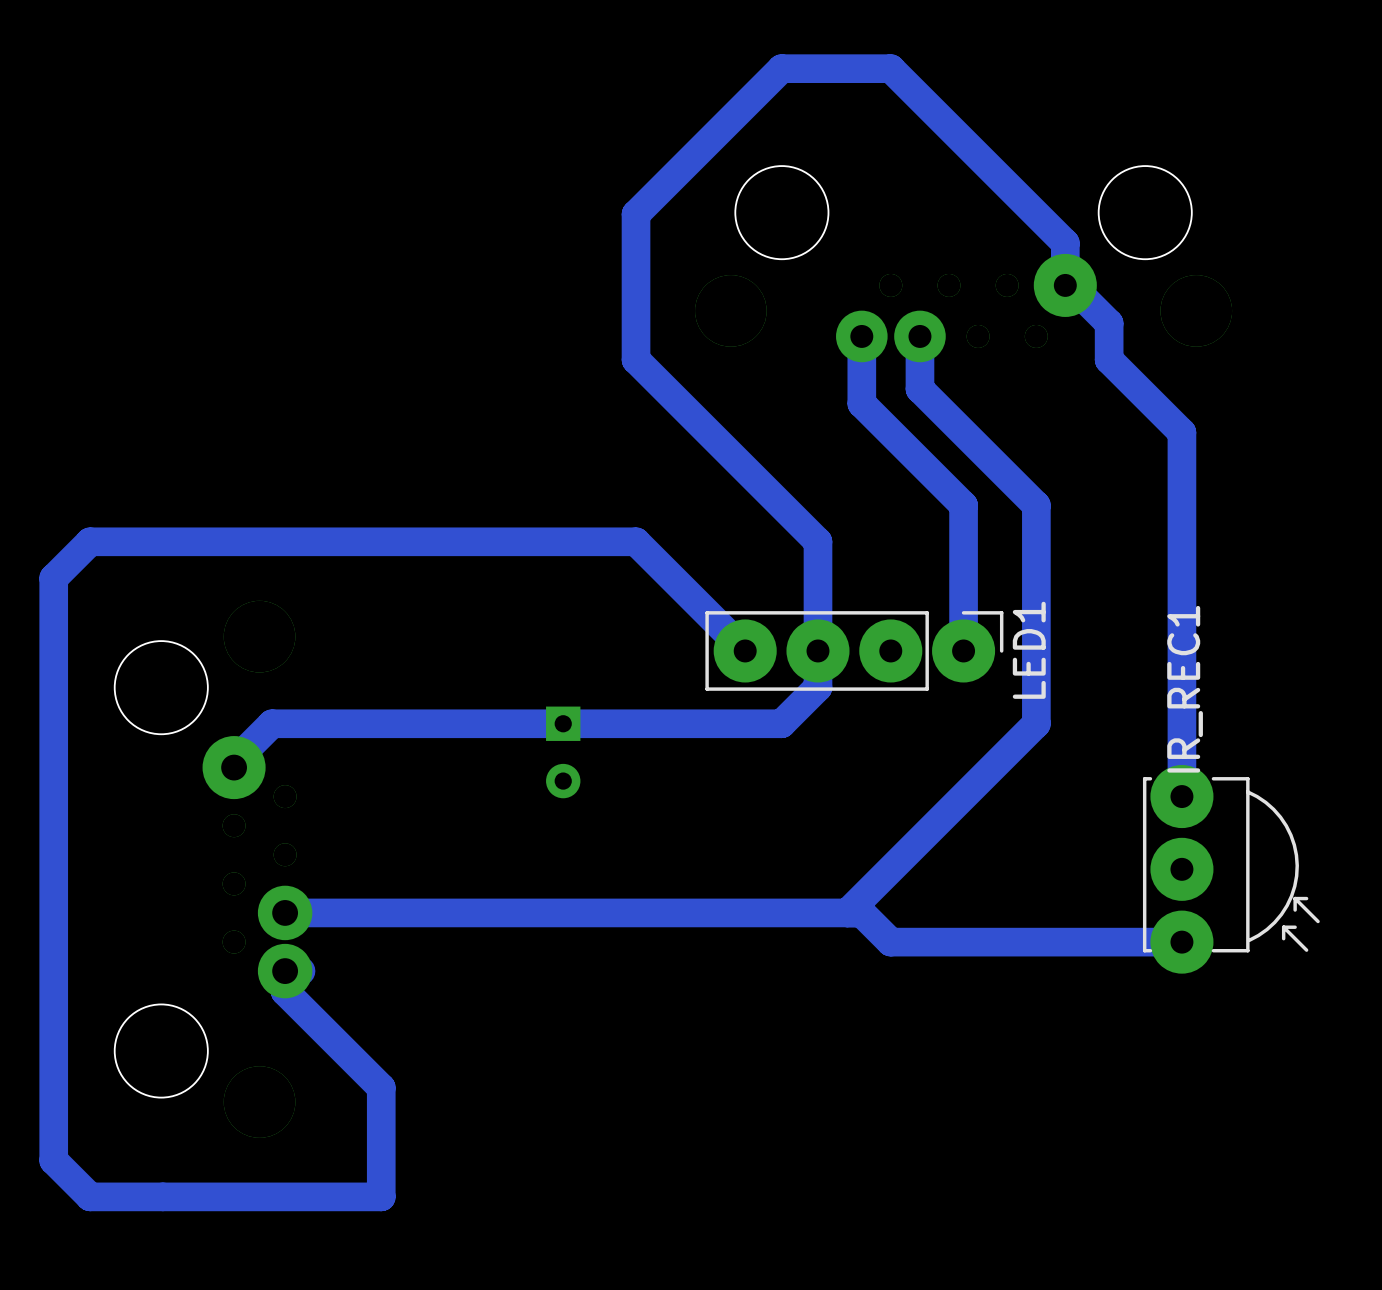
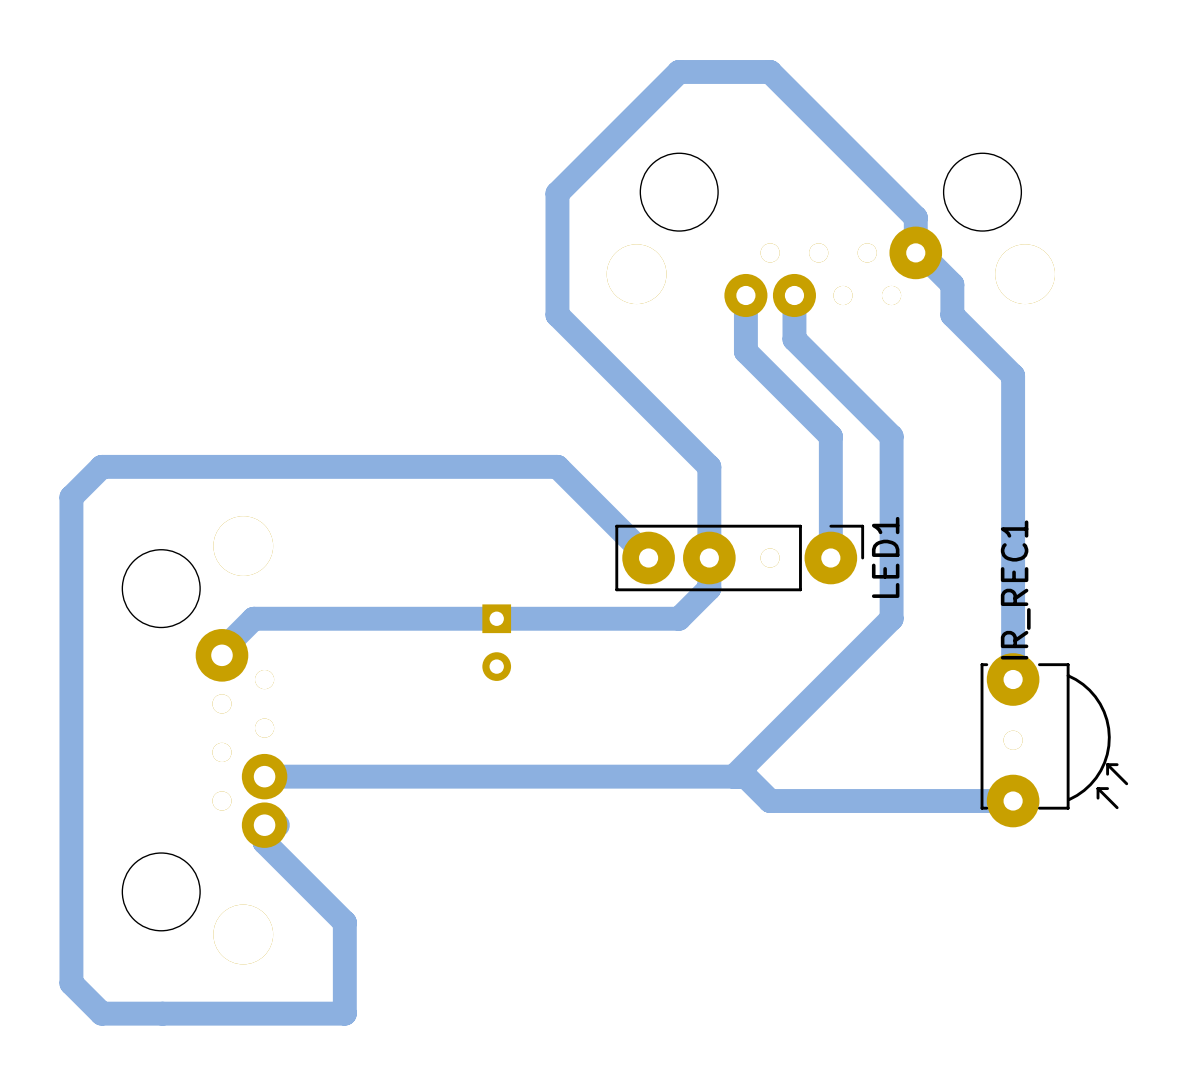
LED1 footprint: [705, 611, 1004, 691] -> [615, 524, 865, 592]
IR_REC1 footprint: [1142, 765, 1320, 974] -> [980, 653, 1129, 828]

